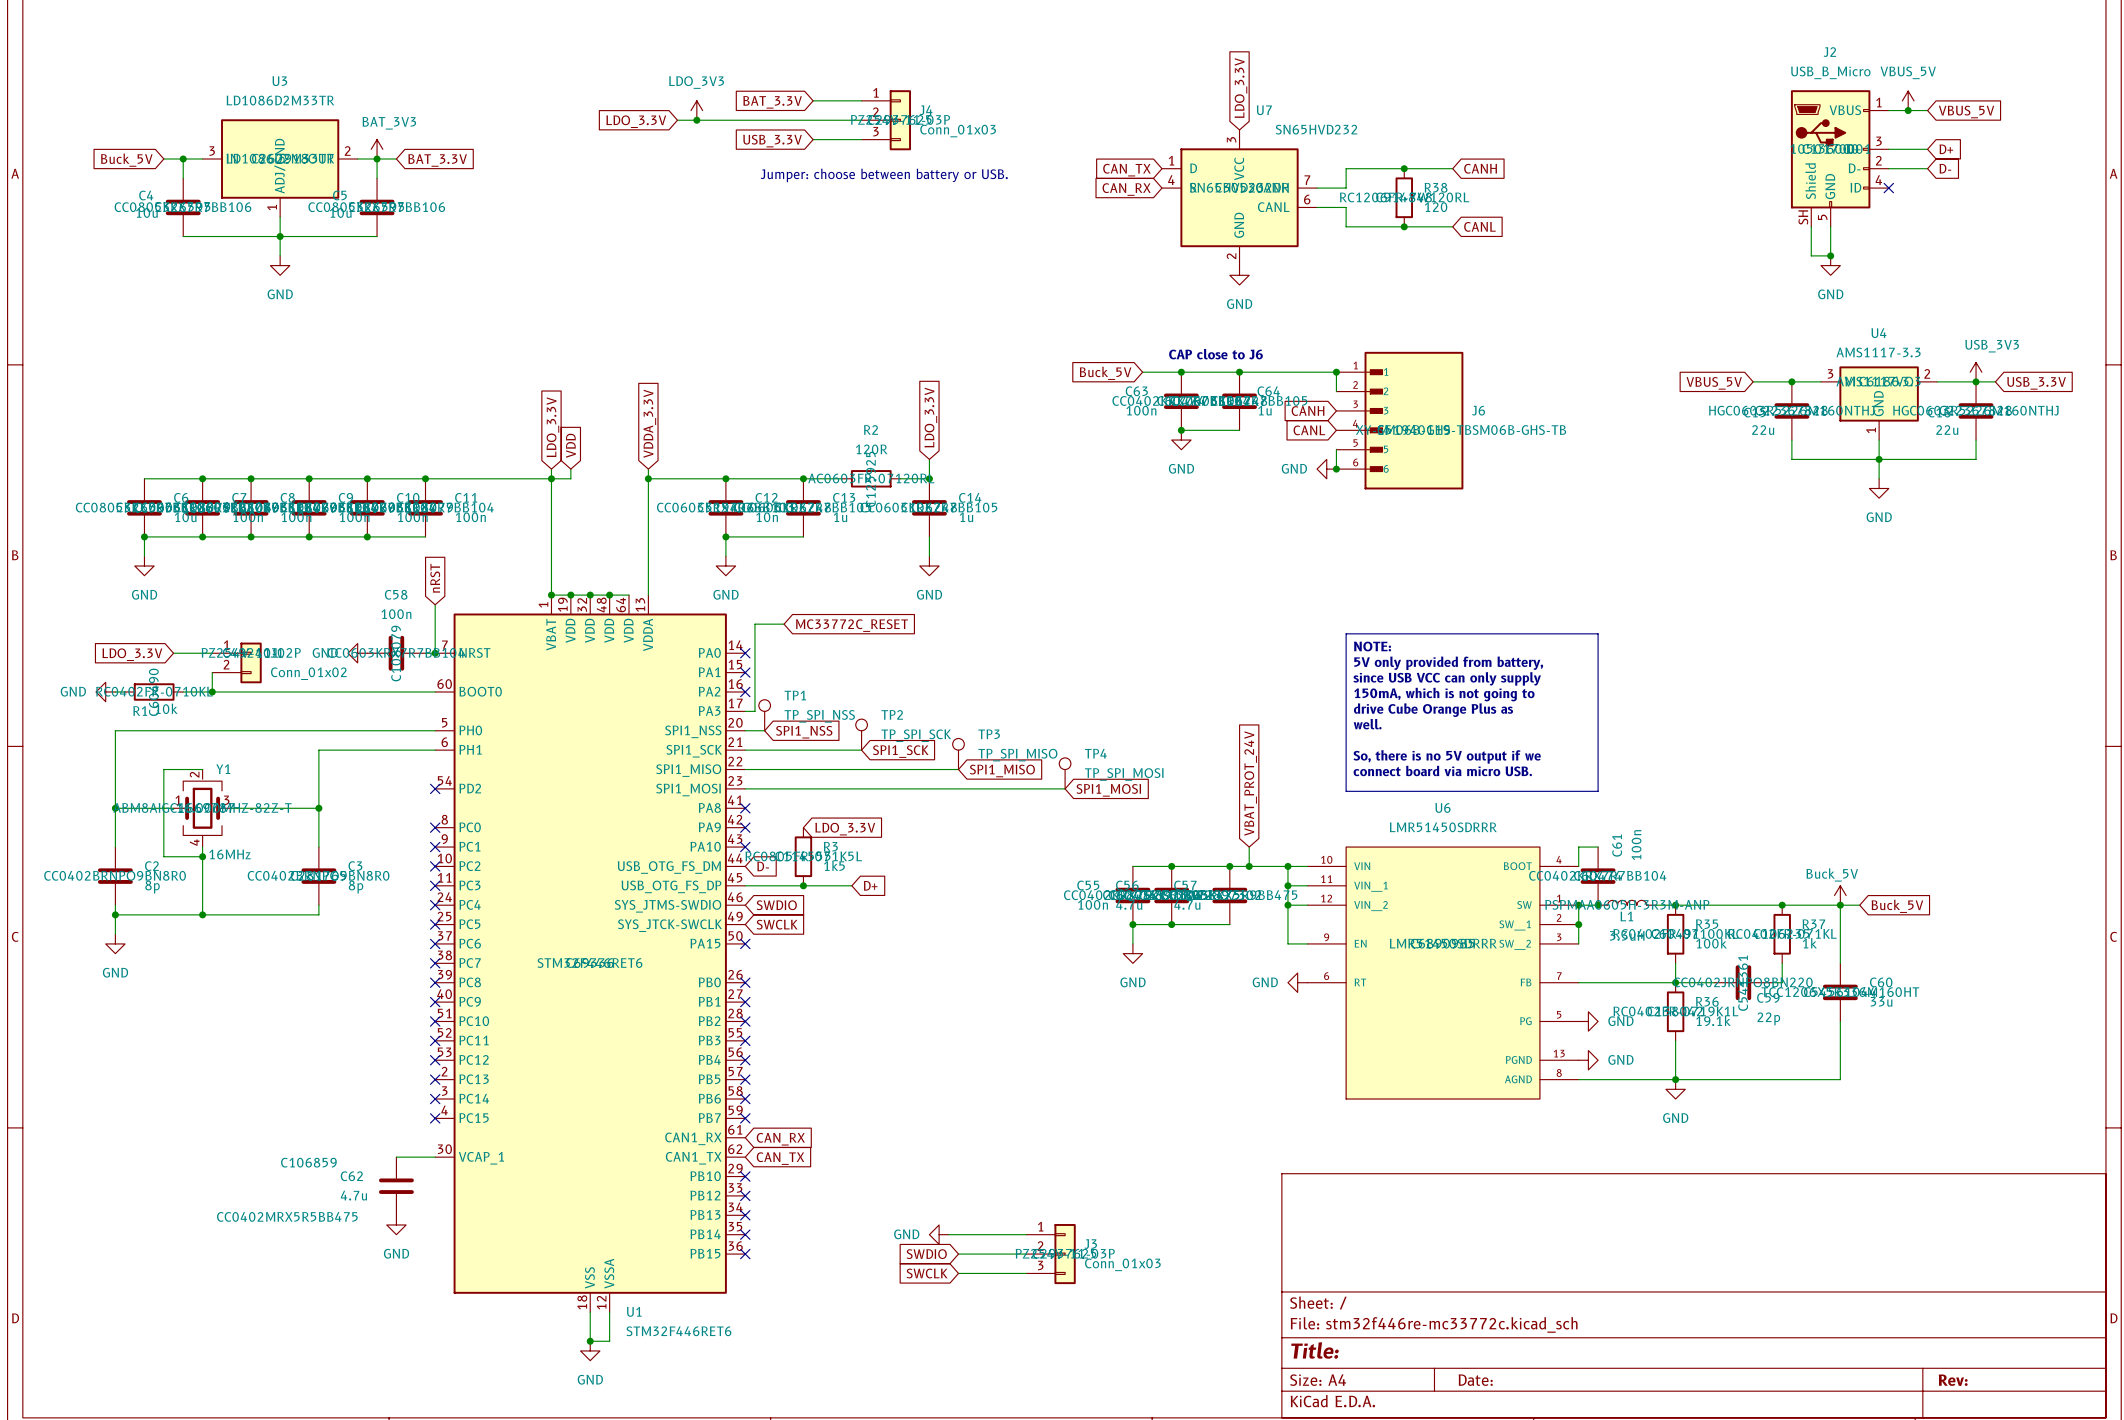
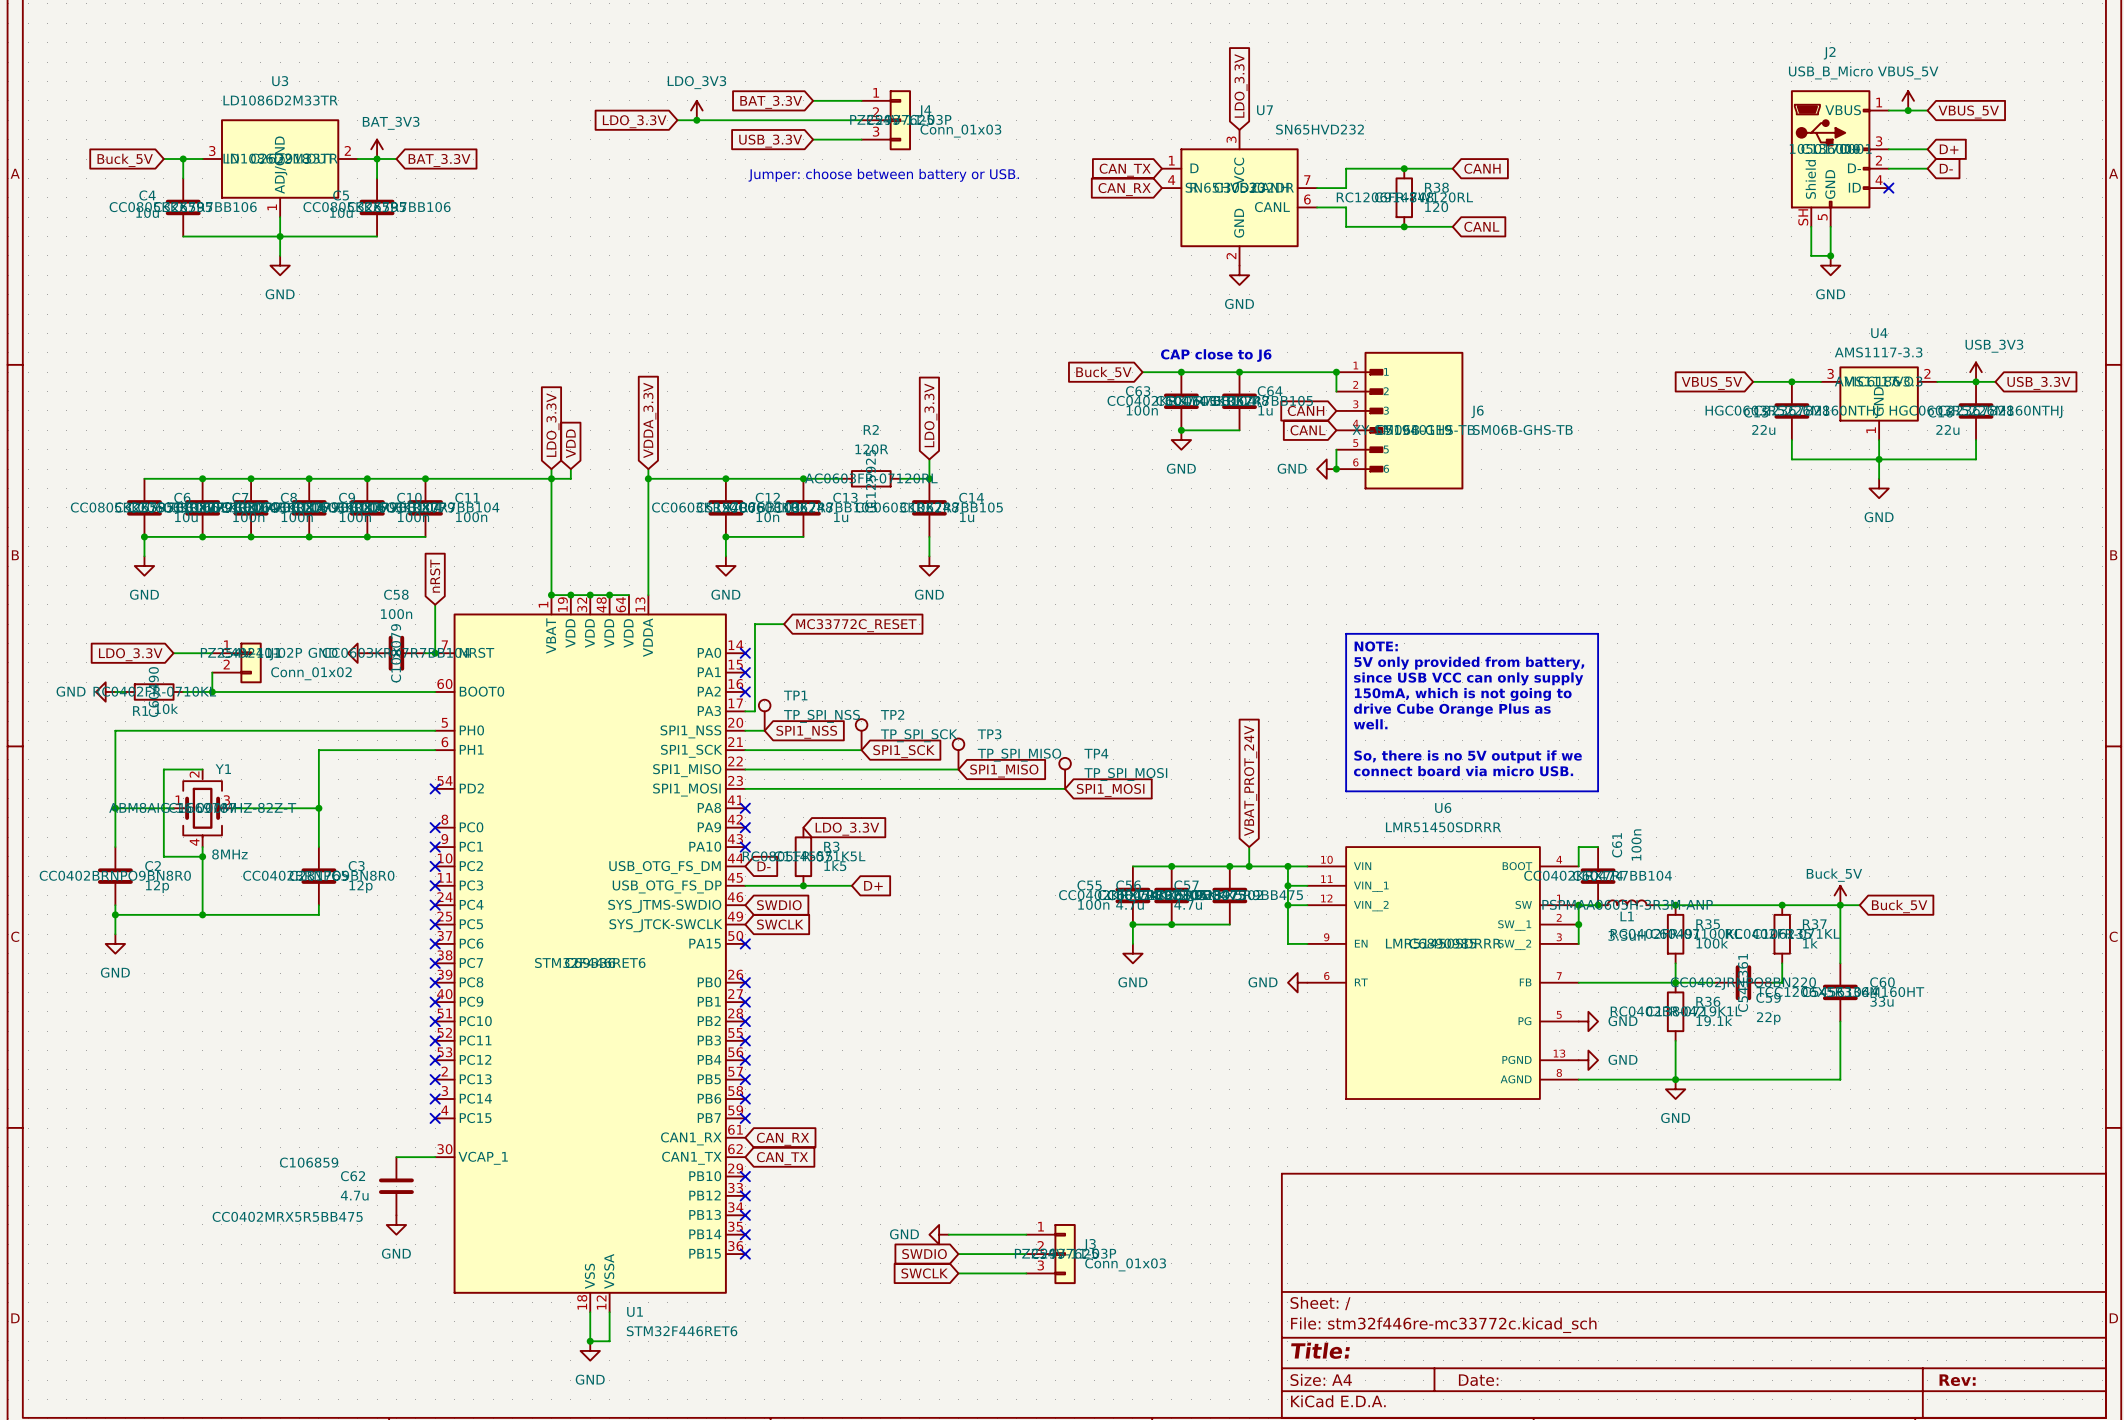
Y1 value: 16MHz (230, 854) -> 8MHz (229, 854)
C2 value: 8p (152, 887) -> 12p (157, 886)
C3 value: 8p (356, 887) -> 12p (361, 886)

